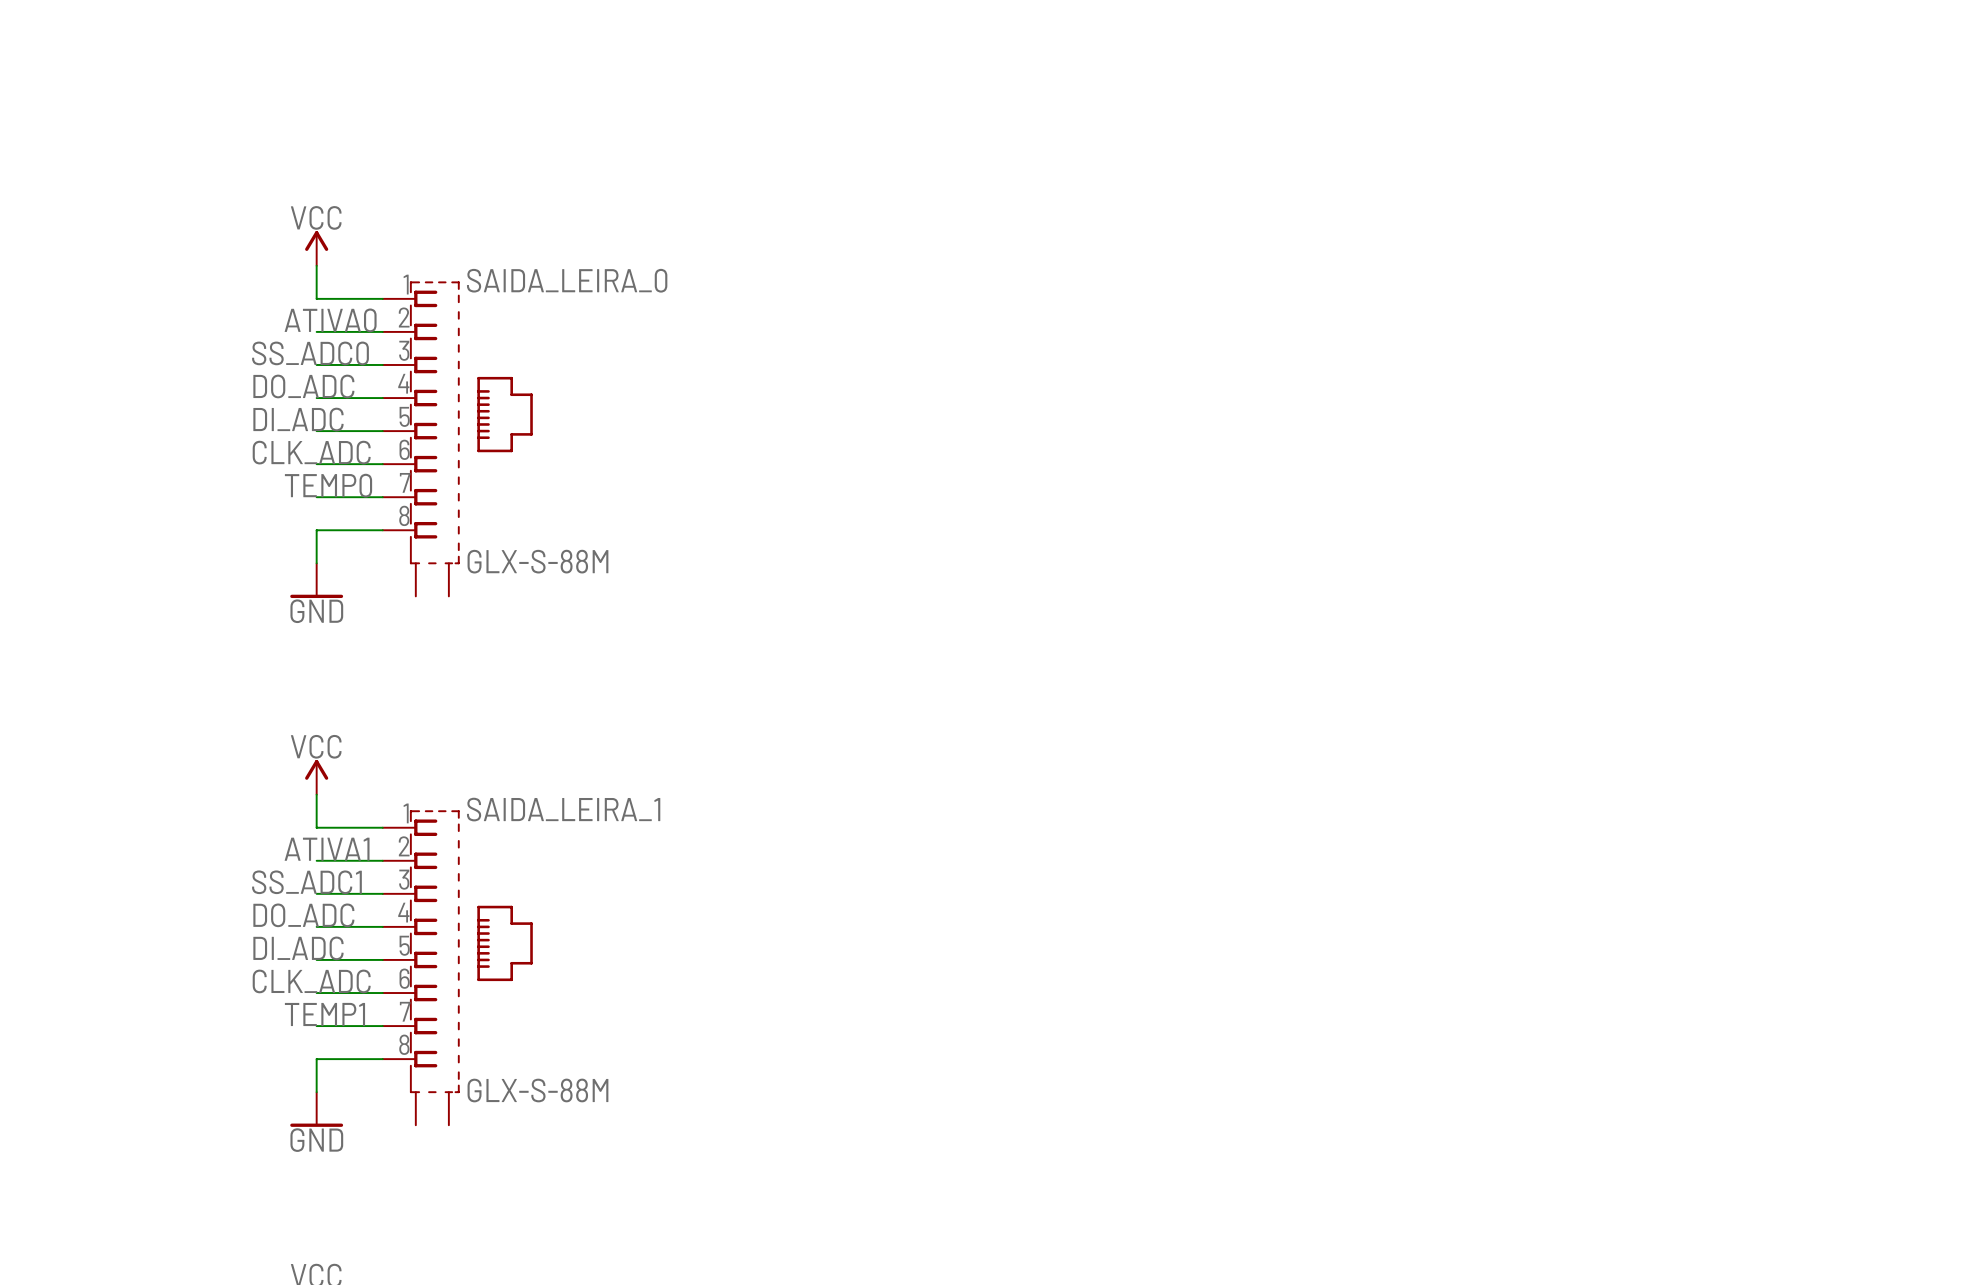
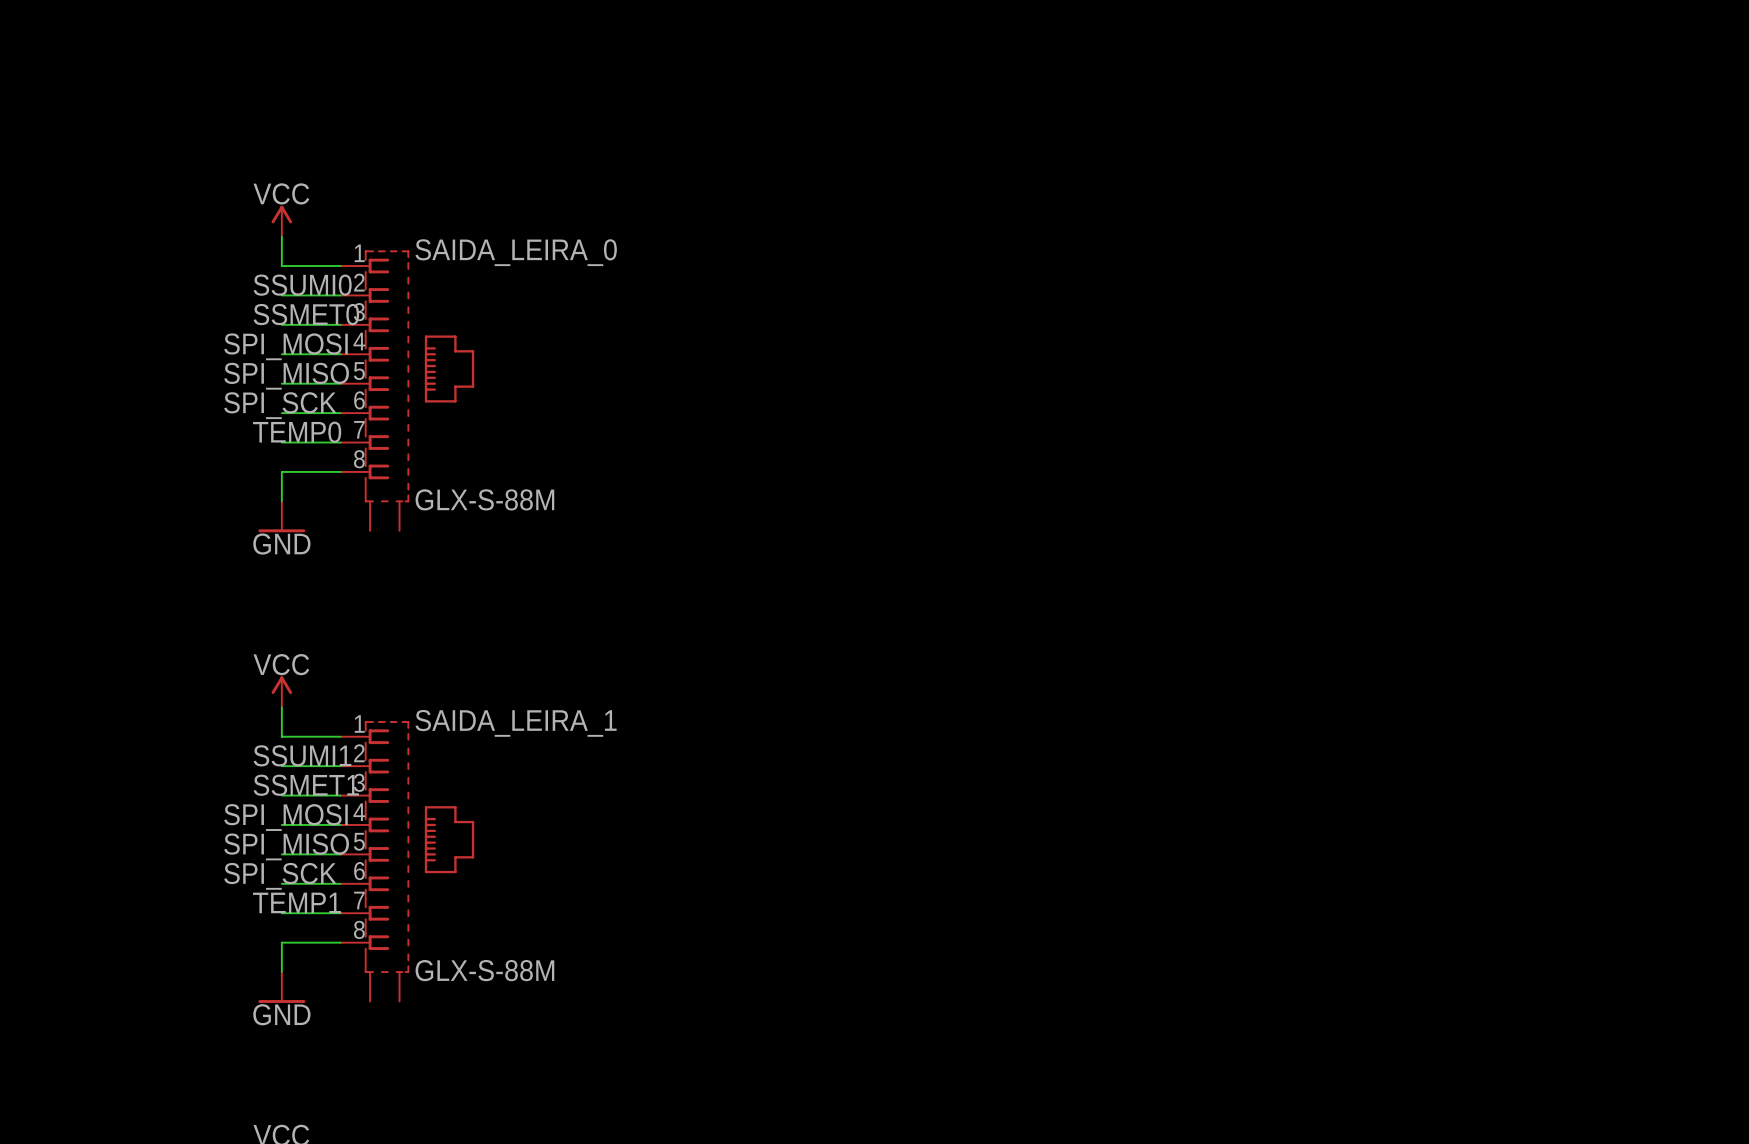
label: ATIVA0 (330, 320) -> SSUMI0 (302, 285)
label: SS_ADC0 (310, 353) -> none
label: none -> SSMET0 (306, 314)
label: DO_ADC (303, 386) -> SPI_MOSI (286, 346)
label: DI_ADC (298, 419) -> SPI_MISO (286, 376)
label: CLK_ADC (311, 452) -> SPI_SCK (280, 405)
label: ATIVA1 (327, 849) -> SSUMI1 (302, 755)
label: SS_ADC1 (306, 882) -> none
label: none -> SSMET1 (306, 785)
label: DO_ADC (303, 915) -> SPI_MOSI (286, 817)
label: DI_ADC (298, 948) -> SPI_MISO (286, 846)
label: CLK_ADC (311, 981) -> SPI_SCK (280, 876)

